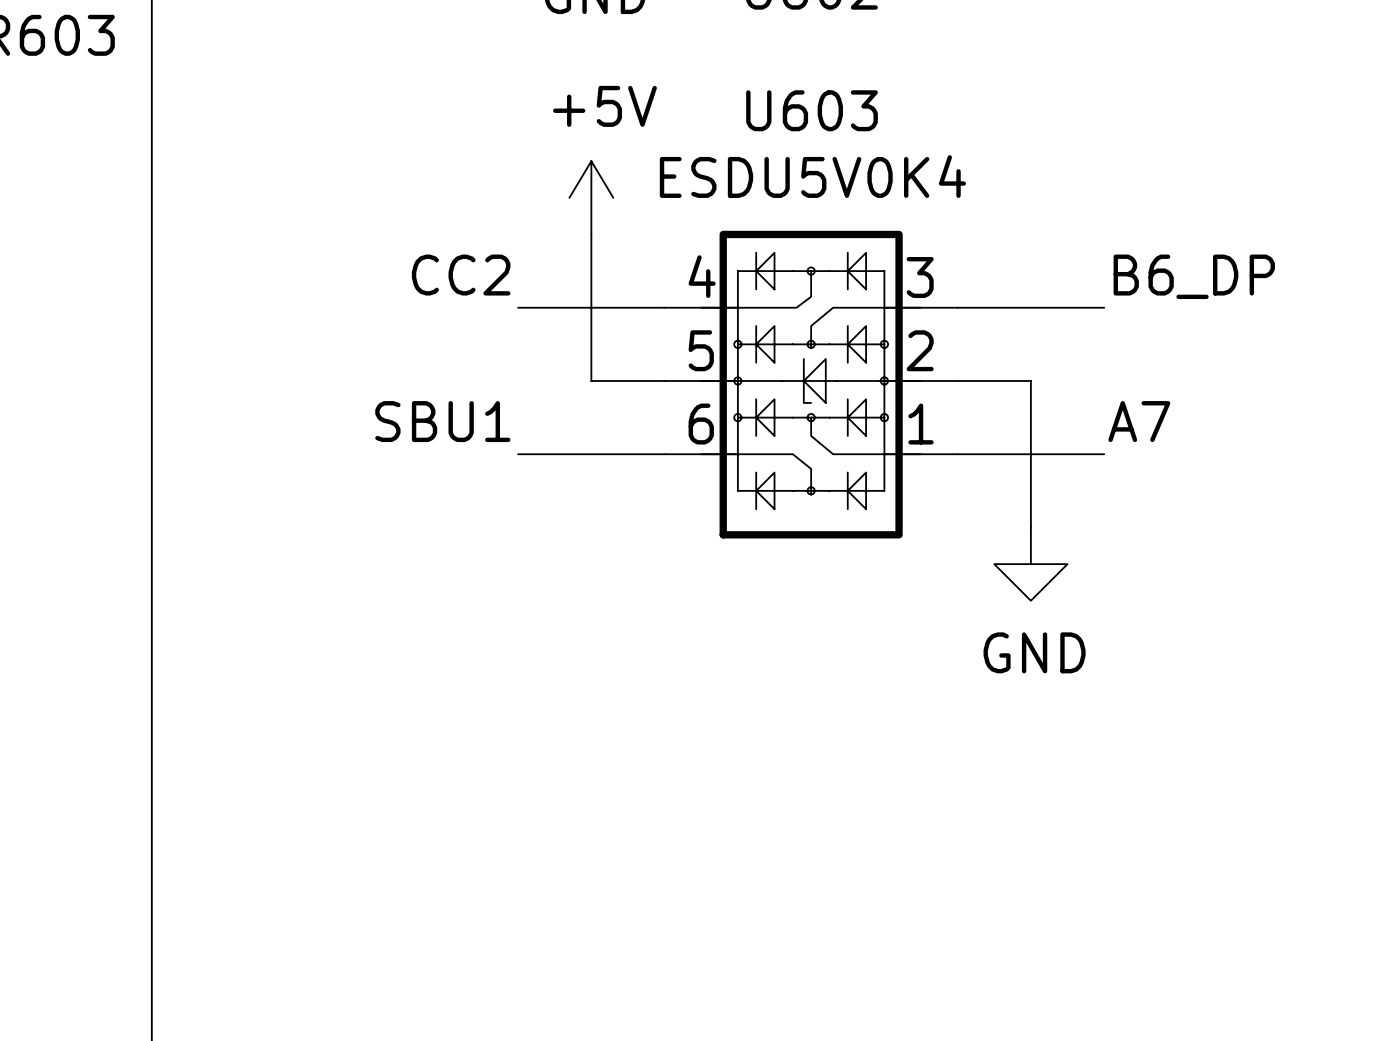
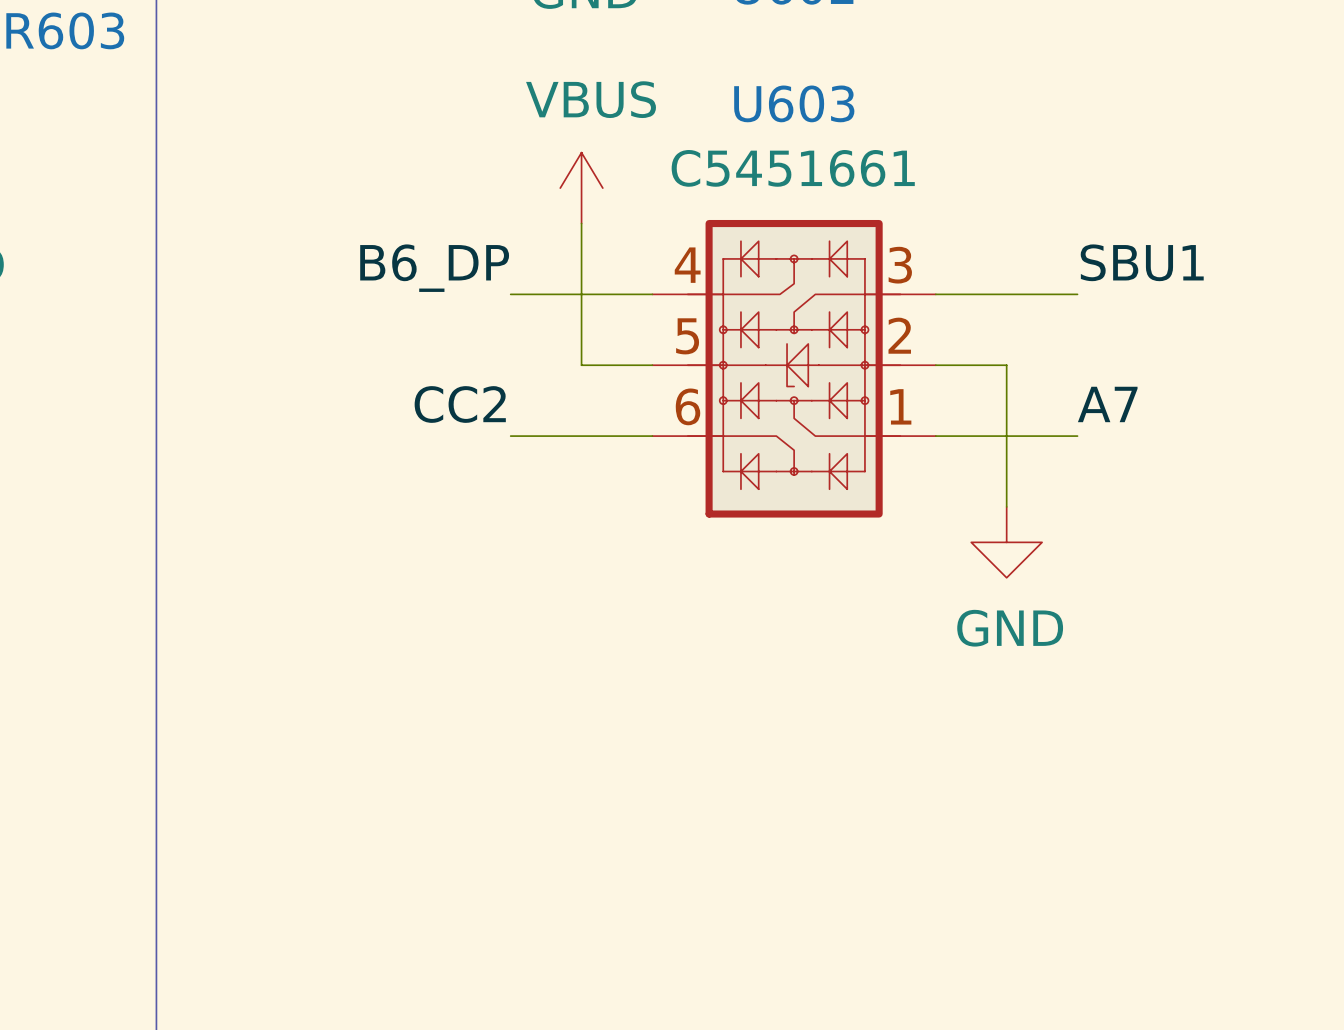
U603 value: ESDU5V0K4 (812, 176) -> C5451661 (793, 168)
power symbol: +5V (591, 197) -> VBUS (581, 188)
label: CC2 (461, 275) -> B6_DP (434, 268)
label: B6_DP (1194, 276) -> SBU1 (1142, 262)
label: SBU1 (442, 421) -> CC2 (460, 404)

